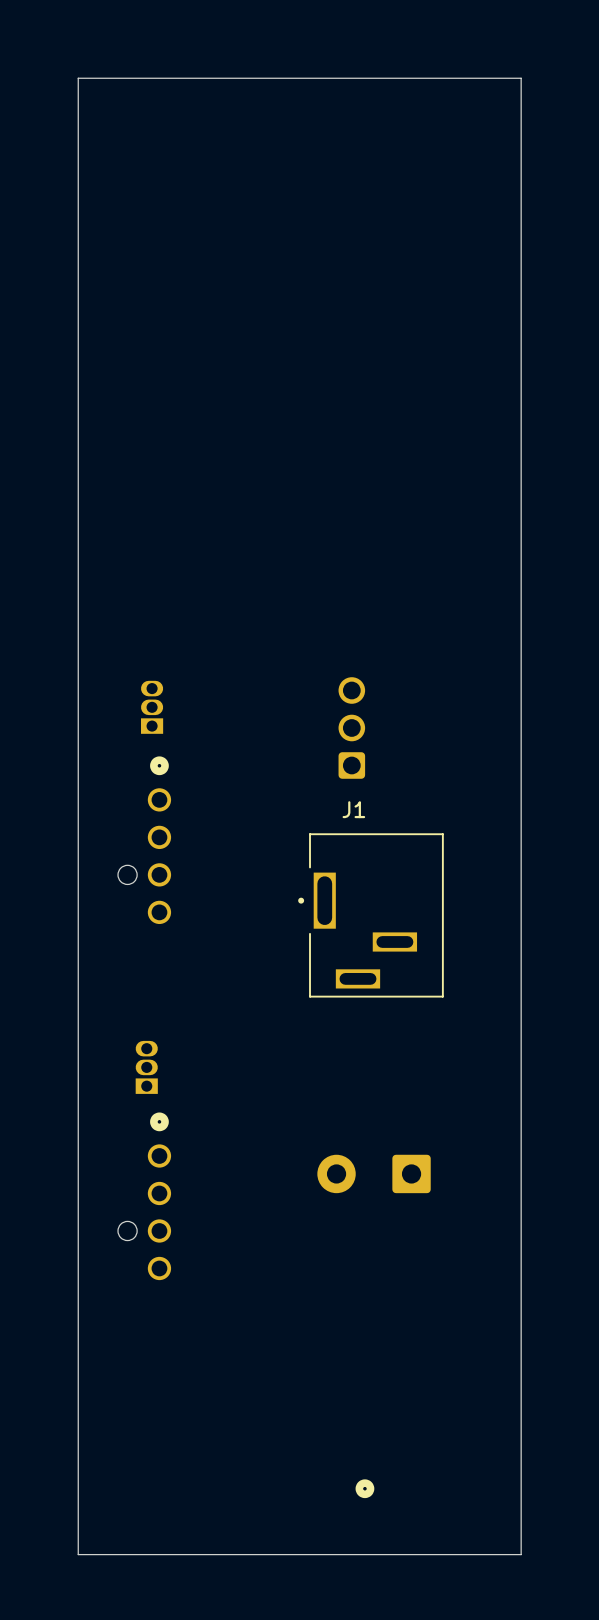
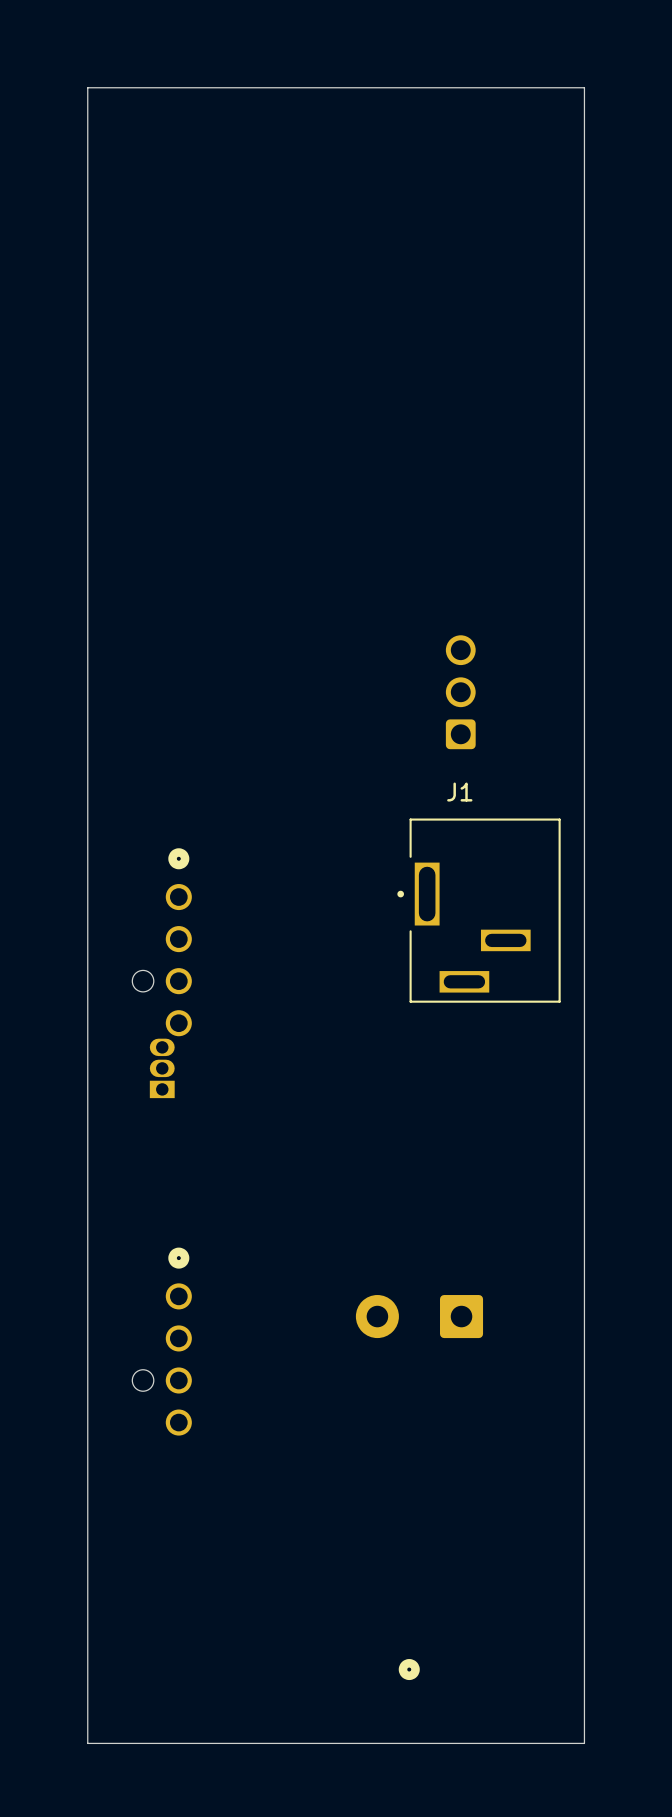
part: (152, 707) -> none
part position: (351, 727) -> (460, 692)
J1 position: (371, 915) -> (479, 910)
part position: (146, 1067) -> (162, 1068)

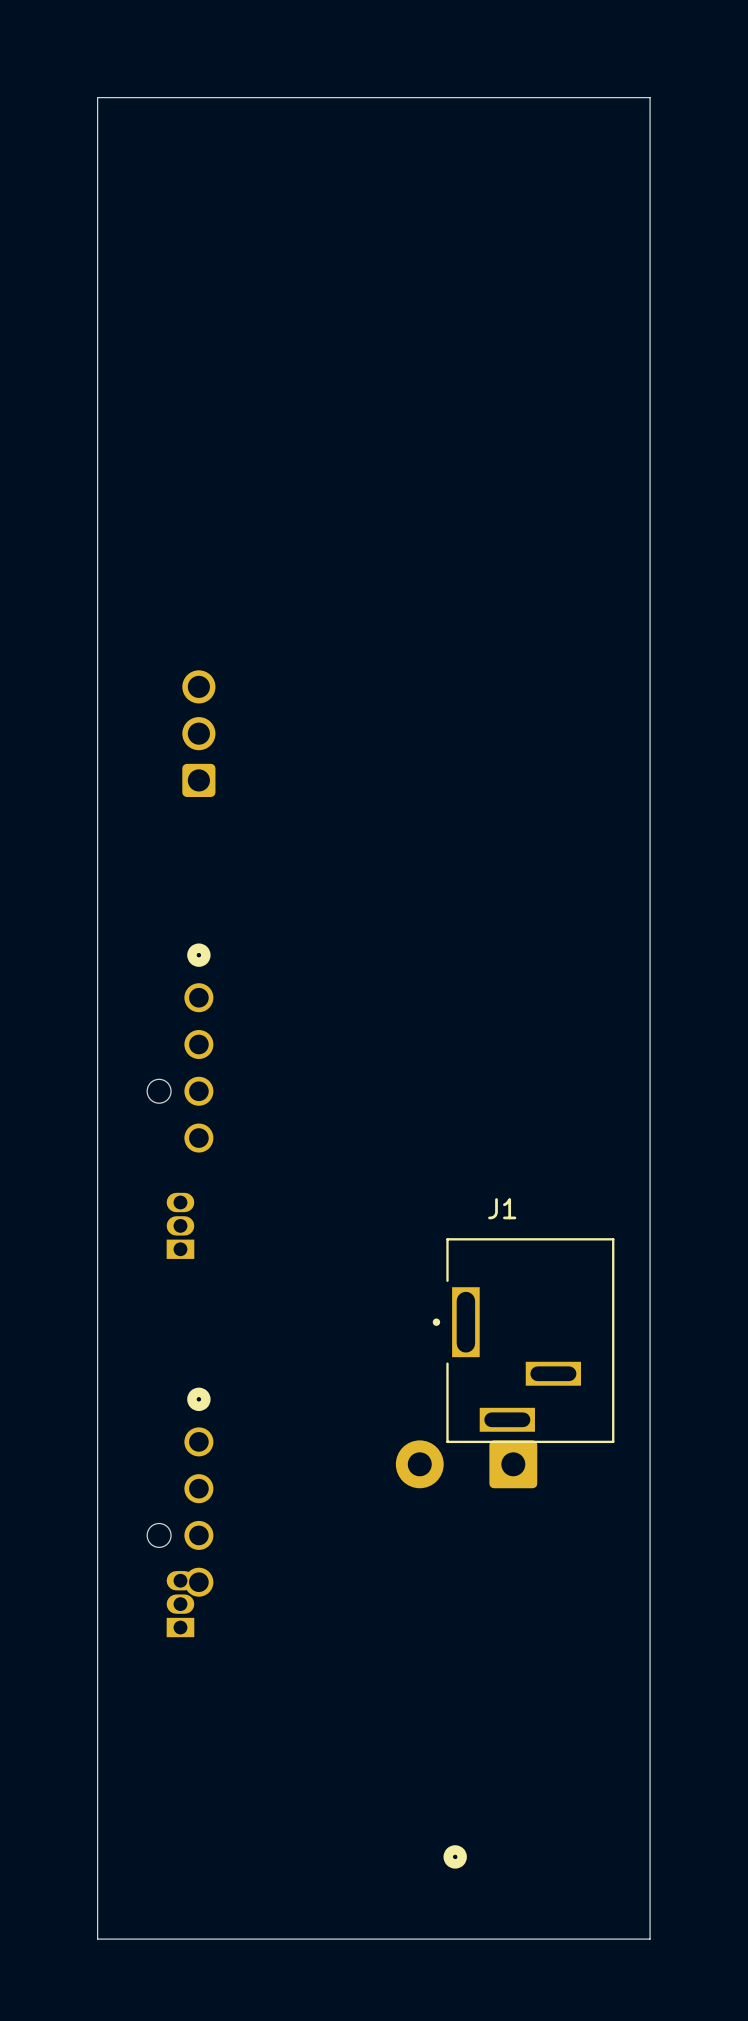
part position: (460, 692) -> (198, 733)
J1 position: (479, 910) -> (523, 1340)
part position: (162, 1068) -> (180, 1225)
part: none -> (180, 1604)

